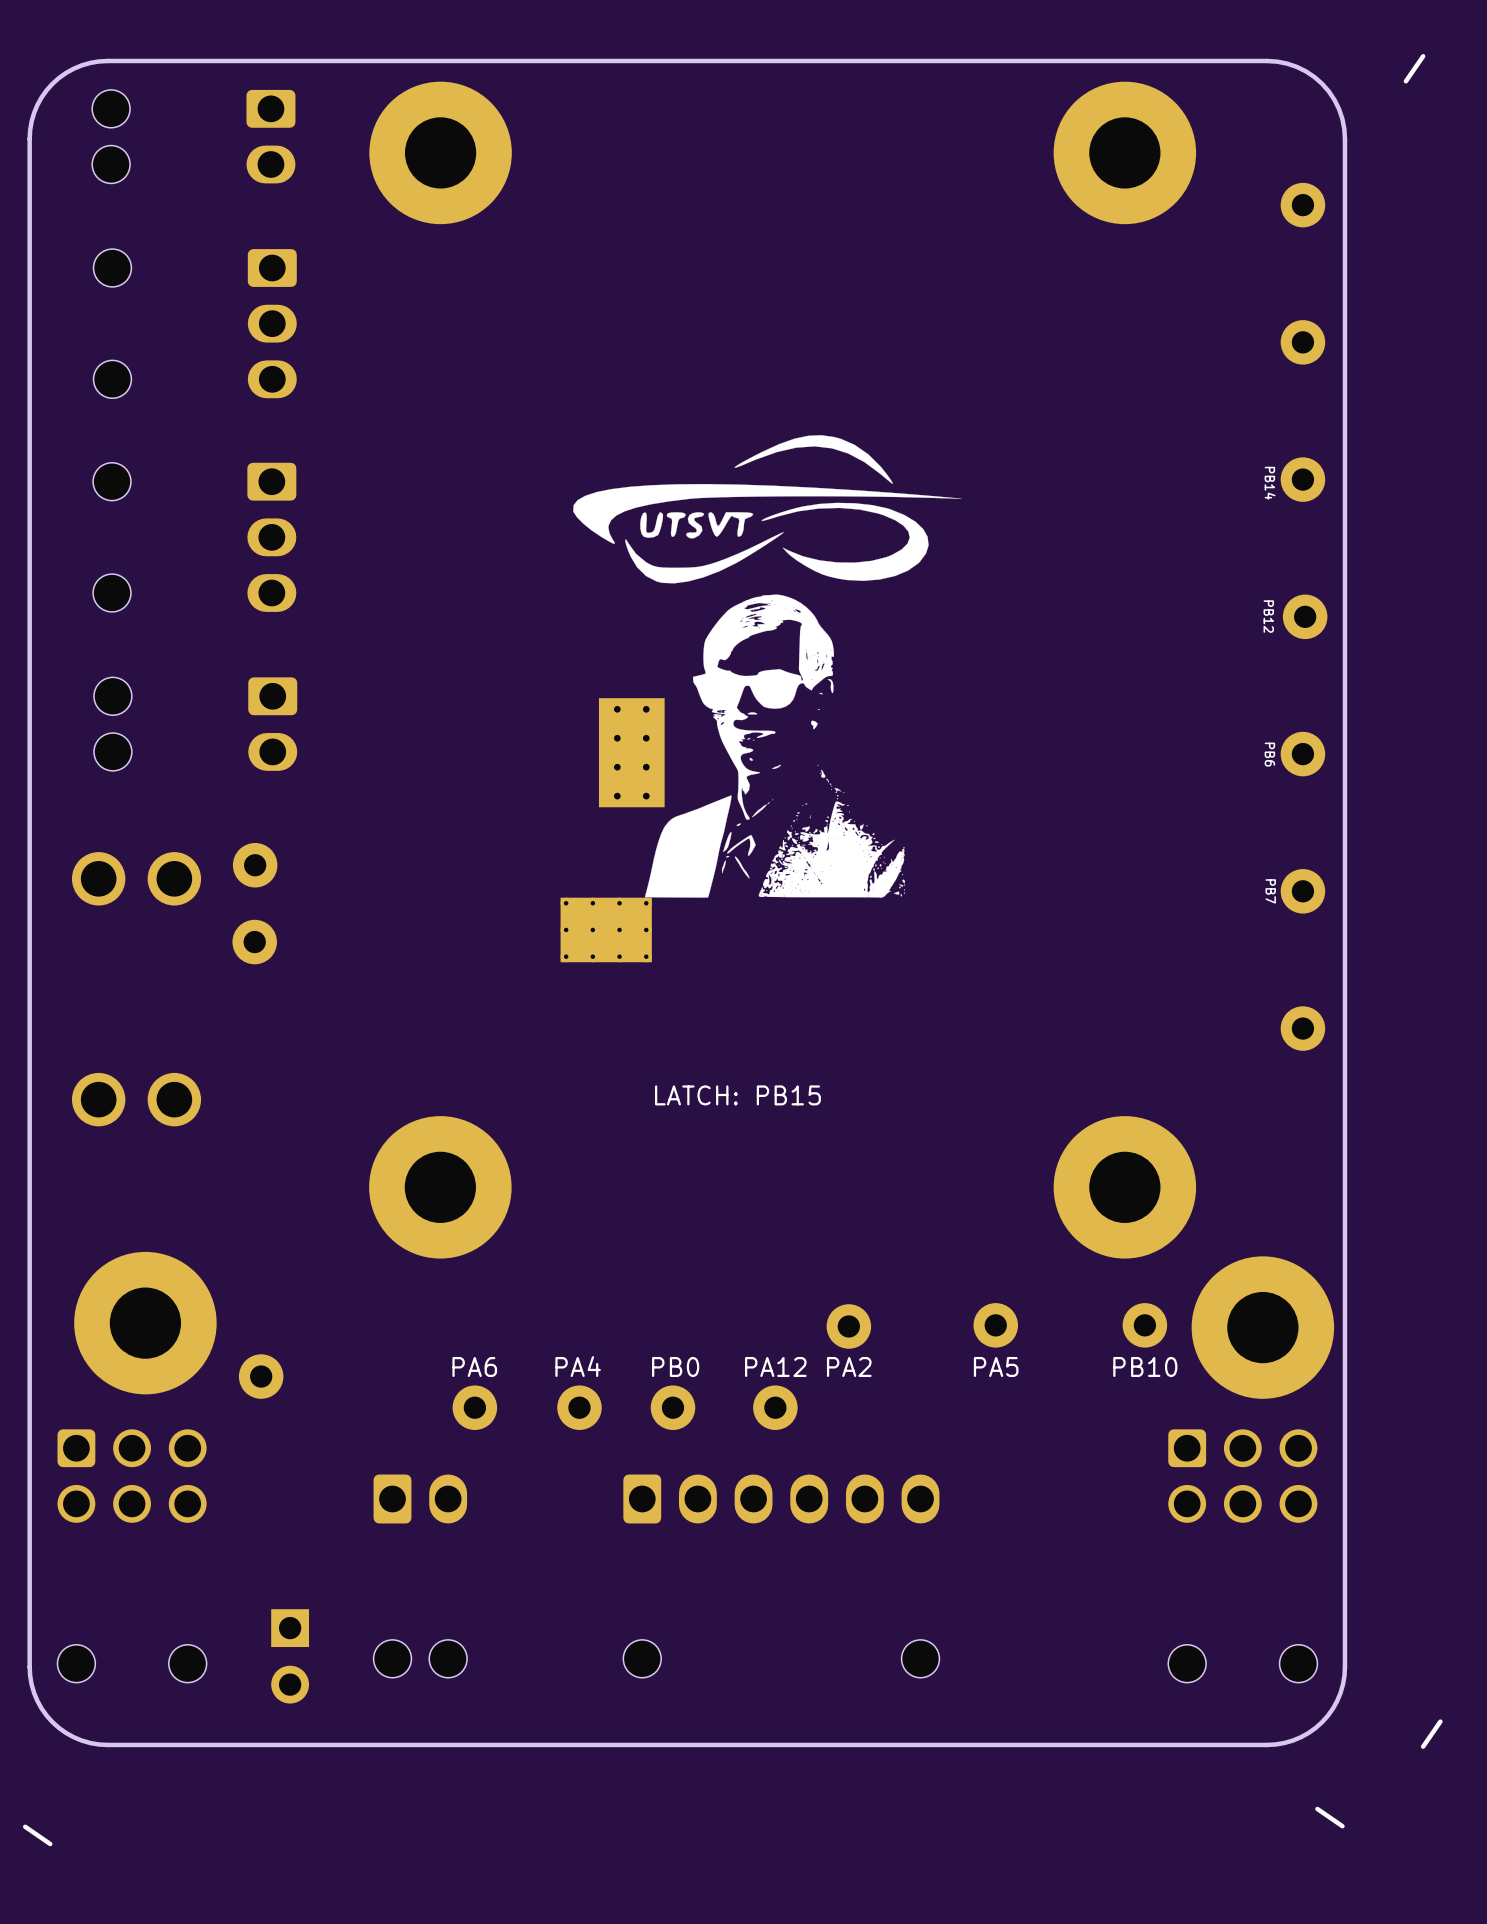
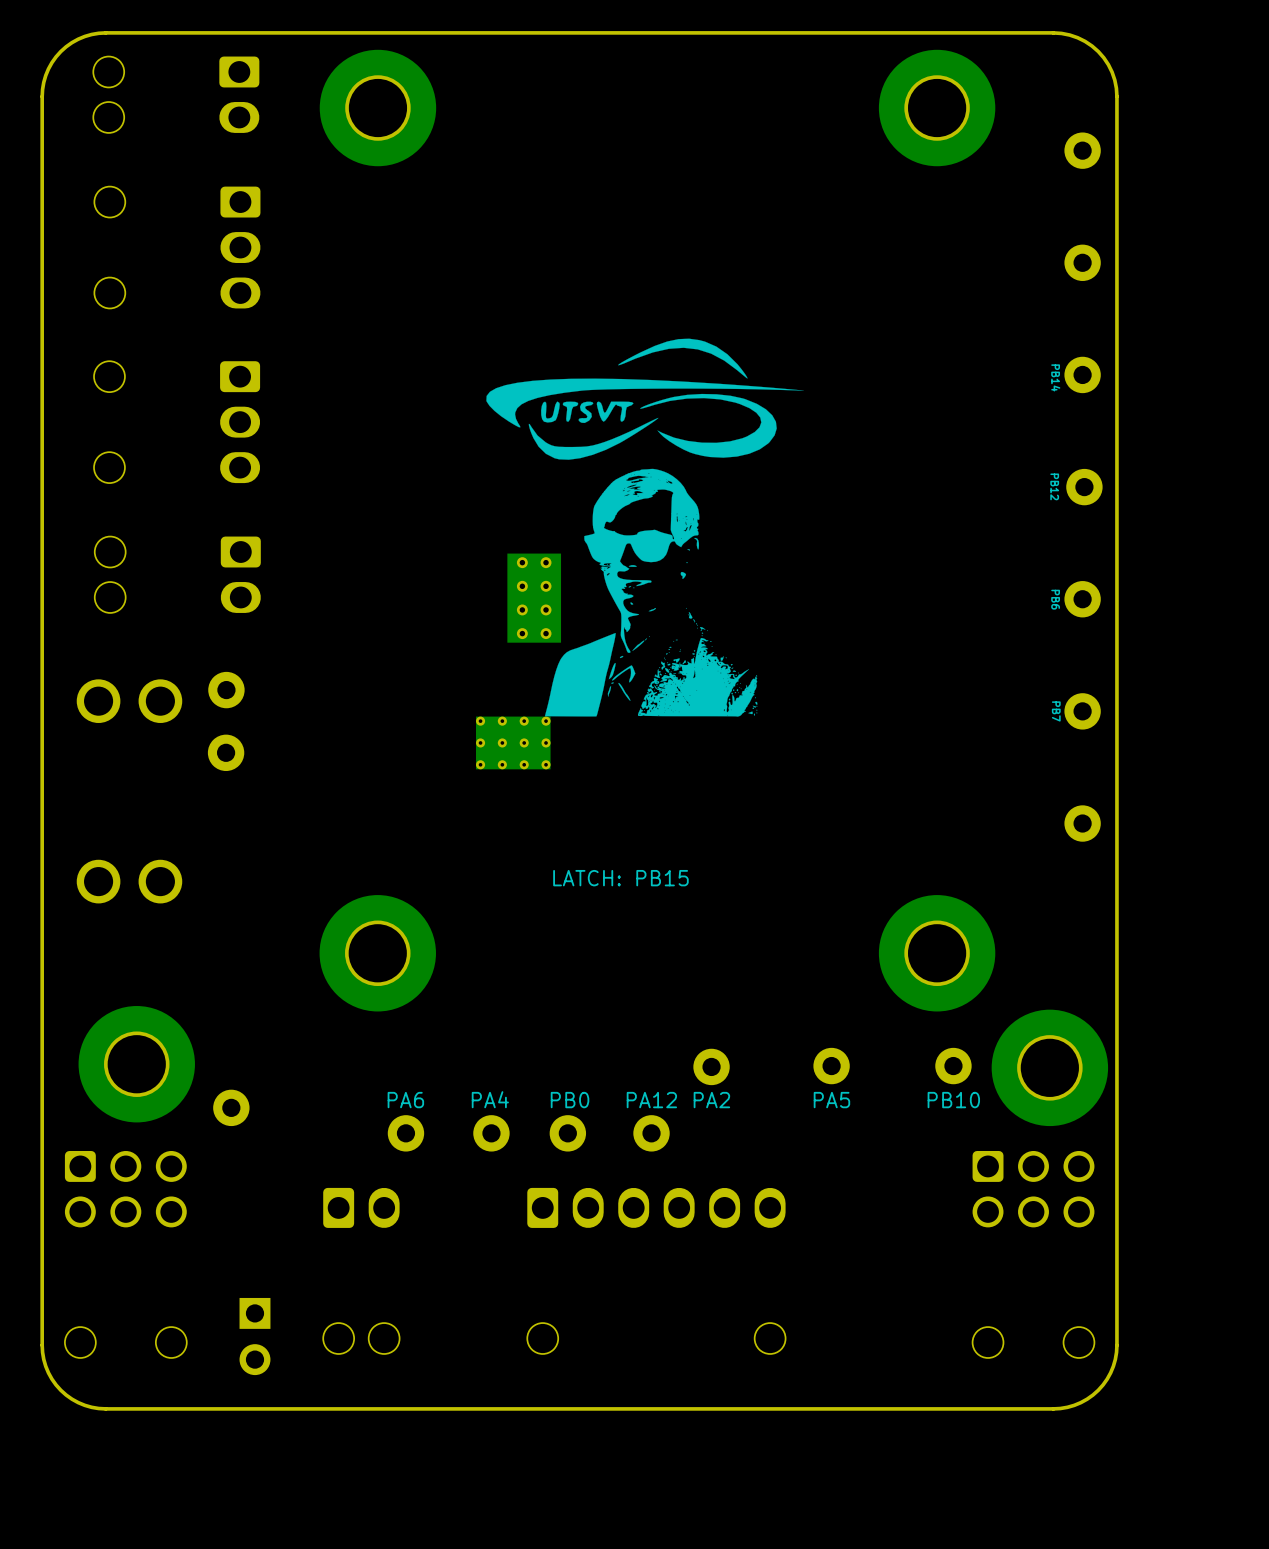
line: (1423, 56) (1405, 81) -> none
line: (1440, 1721) (1423, 1746) -> none
line: (1317, 1808) (1342, 1826) -> none
line: (25, 1826) (50, 1844) -> none

